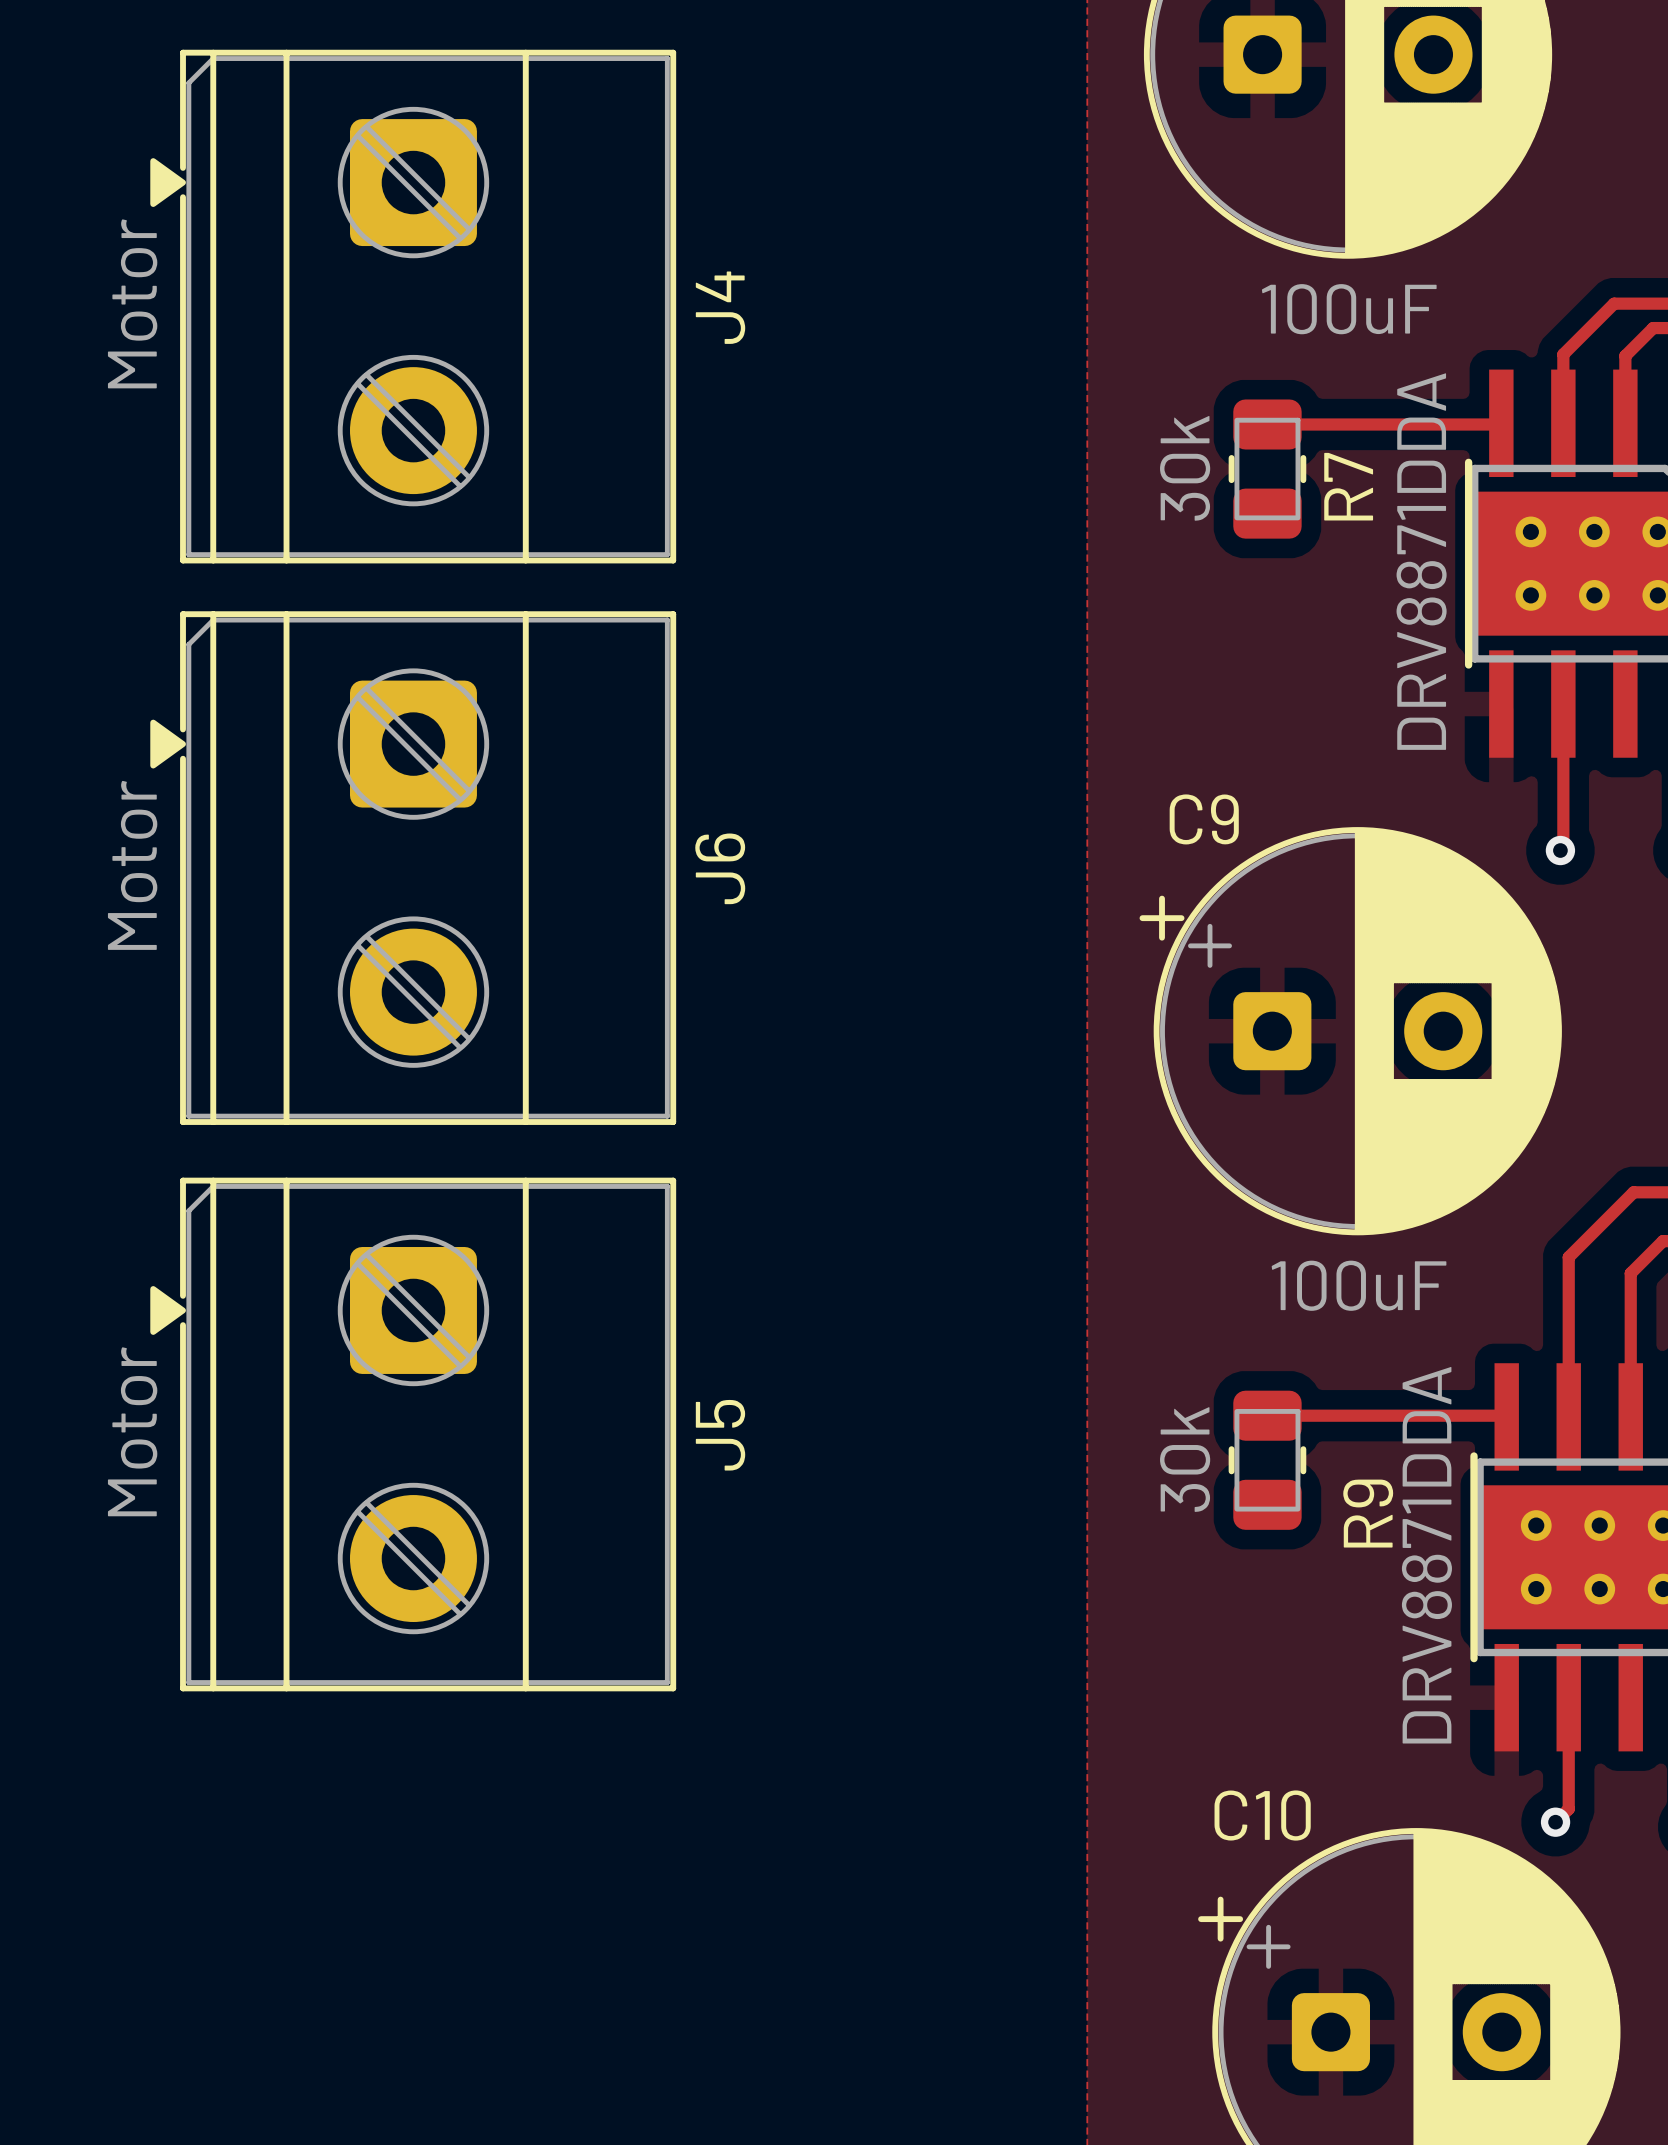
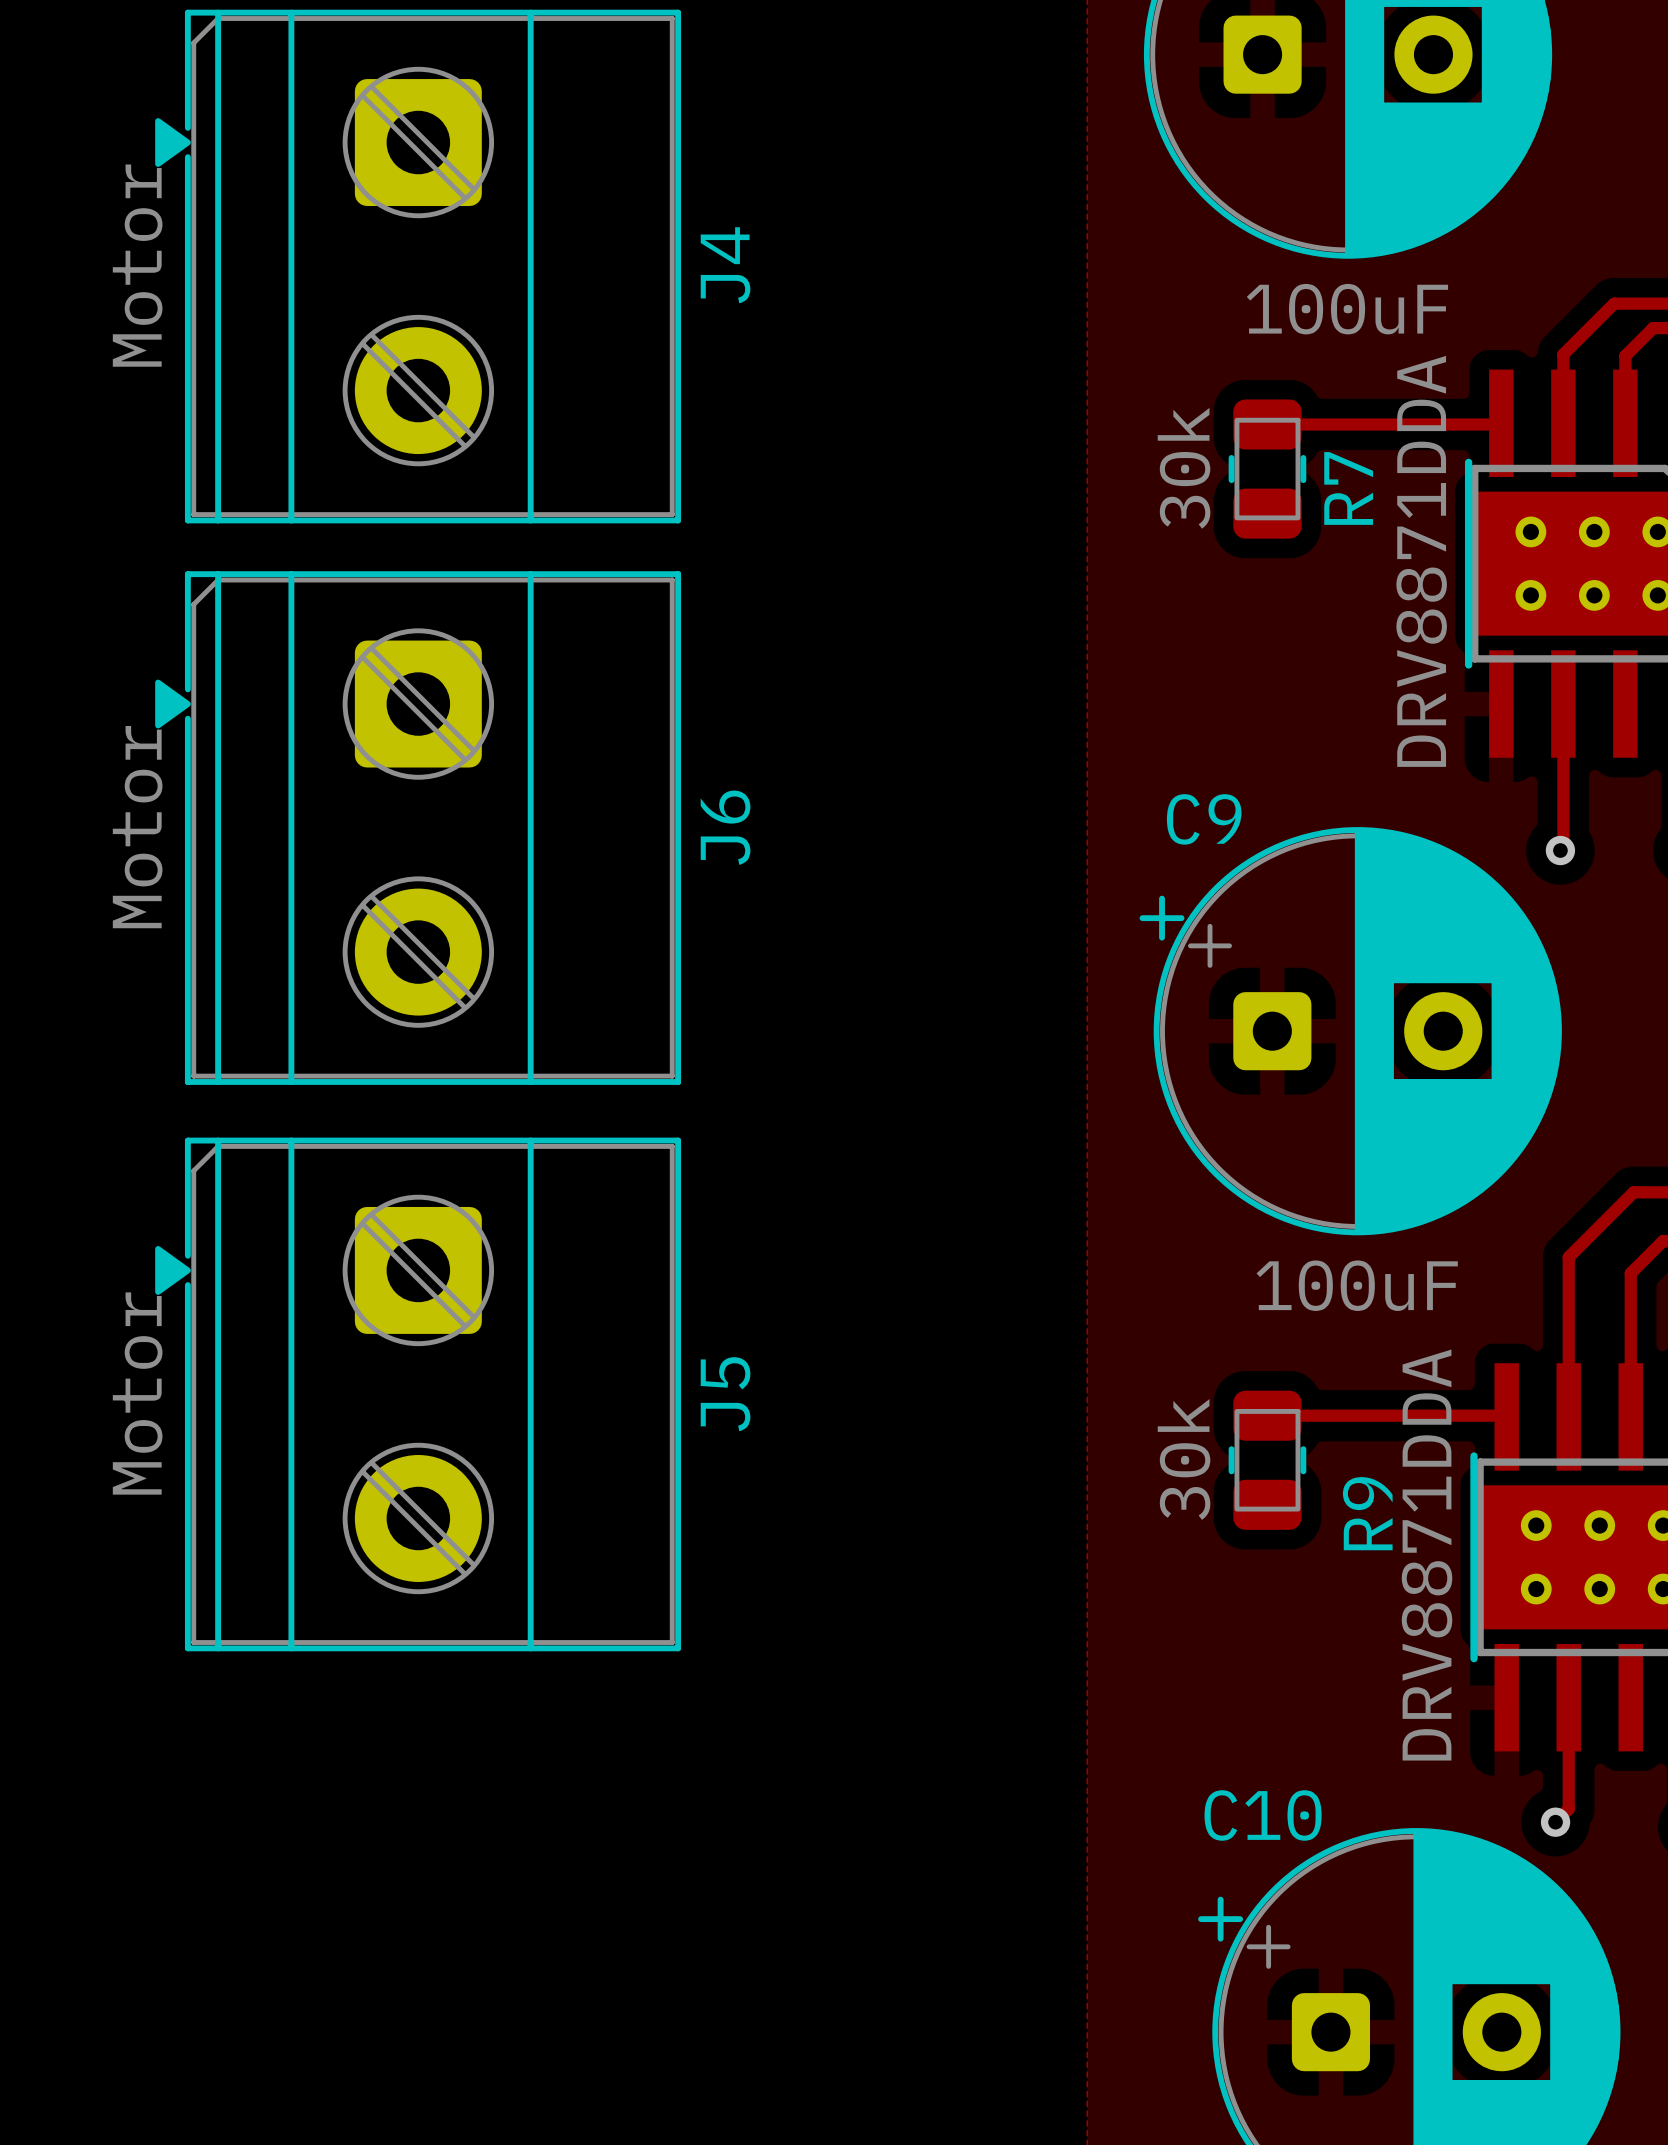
J4 position: (413, 306) -> (418, 266)
J6 position: (413, 868) -> (418, 828)
J5 position: (413, 1434) -> (418, 1394)

